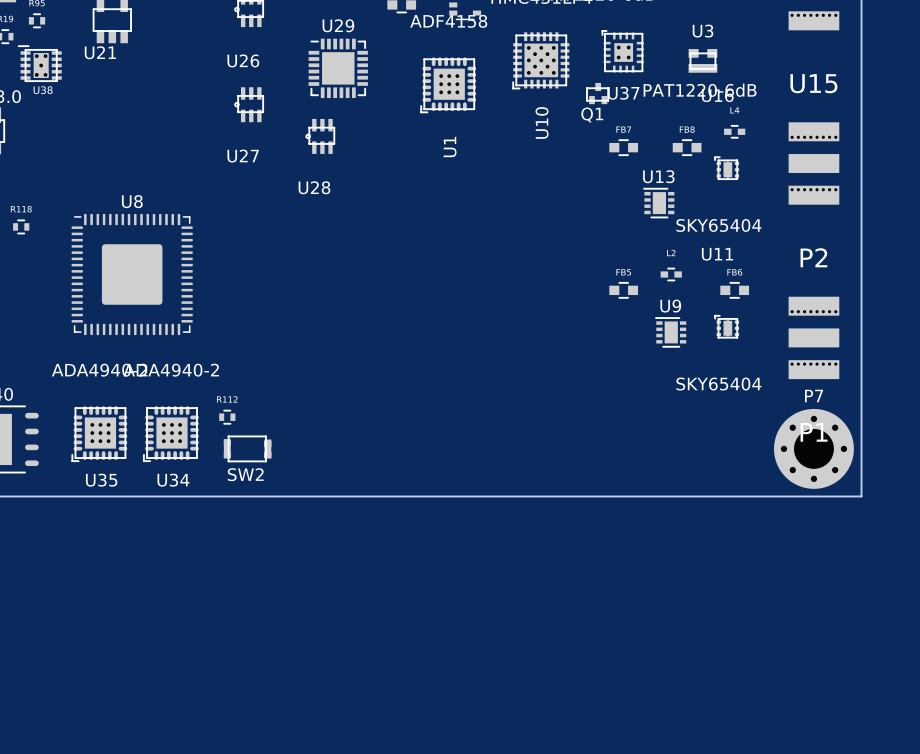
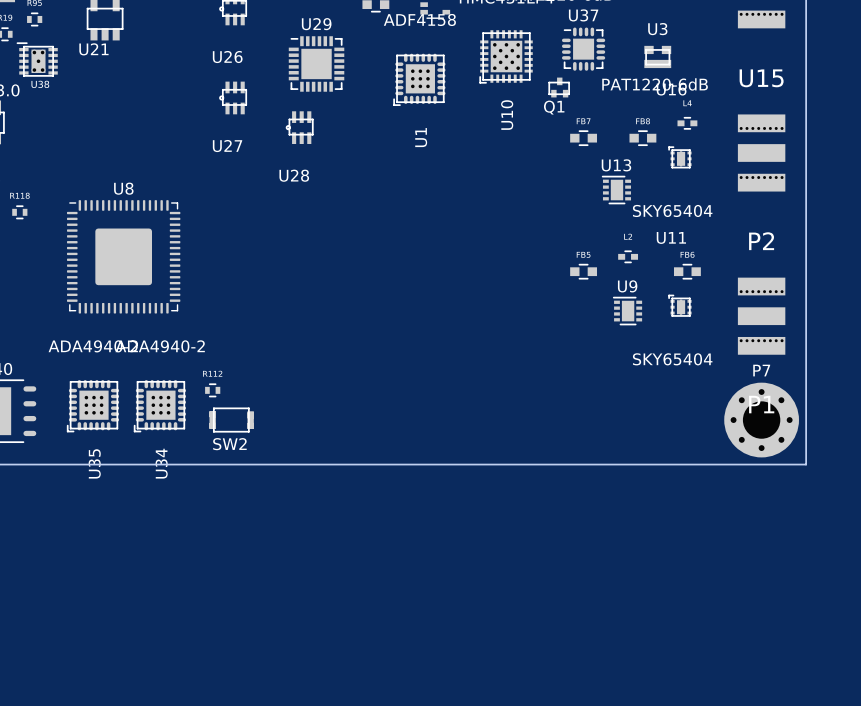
U37 footprint: [601, 30, 644, 73] -> [561, 27, 606, 71]
U37 name position: U37 (623, 93) -> U37 (583, 15)
U35 name rotation: 0° (101, 480) -> 90° counterclockwise (94, 463)
U34 name rotation: 0° (173, 480) -> 90° counterclockwise (161, 463)

